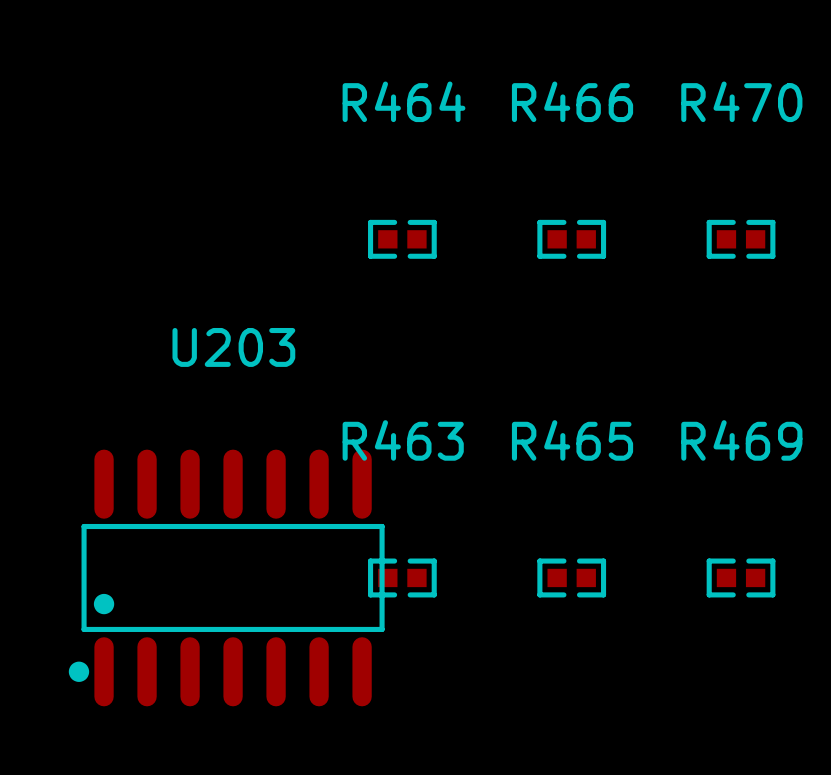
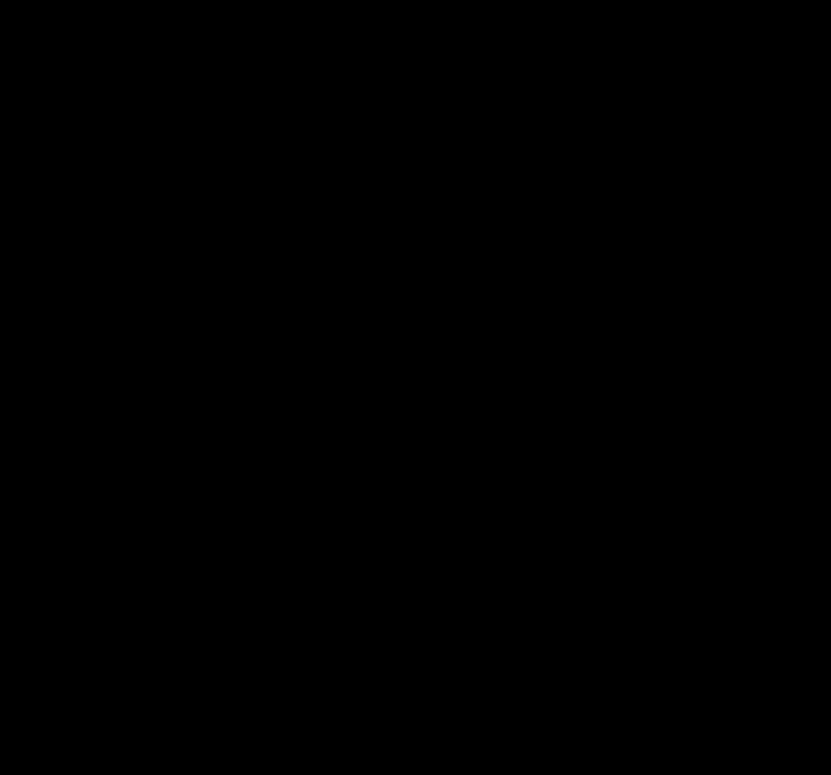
R464: (402, 239) -> none
R466: (571, 239) -> none
R470: (741, 239) -> none
U203: (226, 577) -> none
R463: (402, 577) -> none
R465: (571, 577) -> none
R469: (741, 577) -> none

